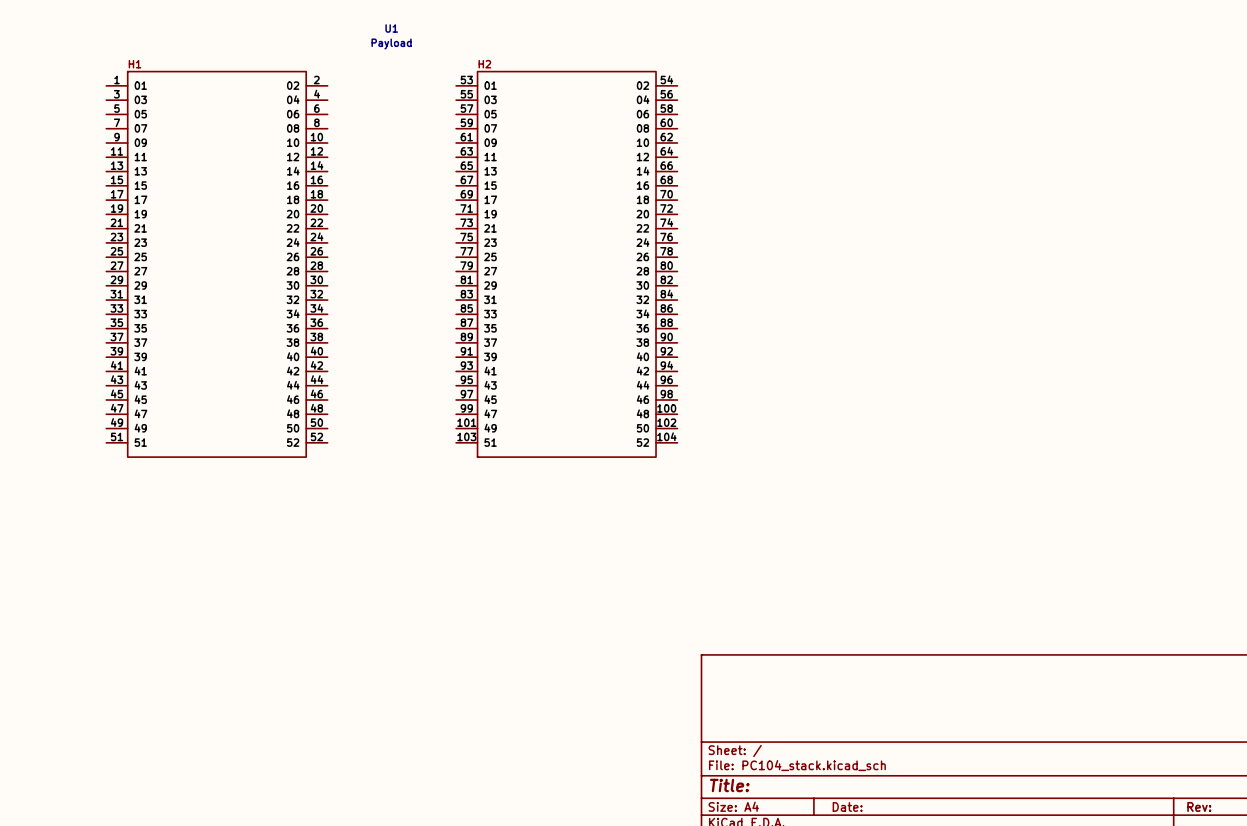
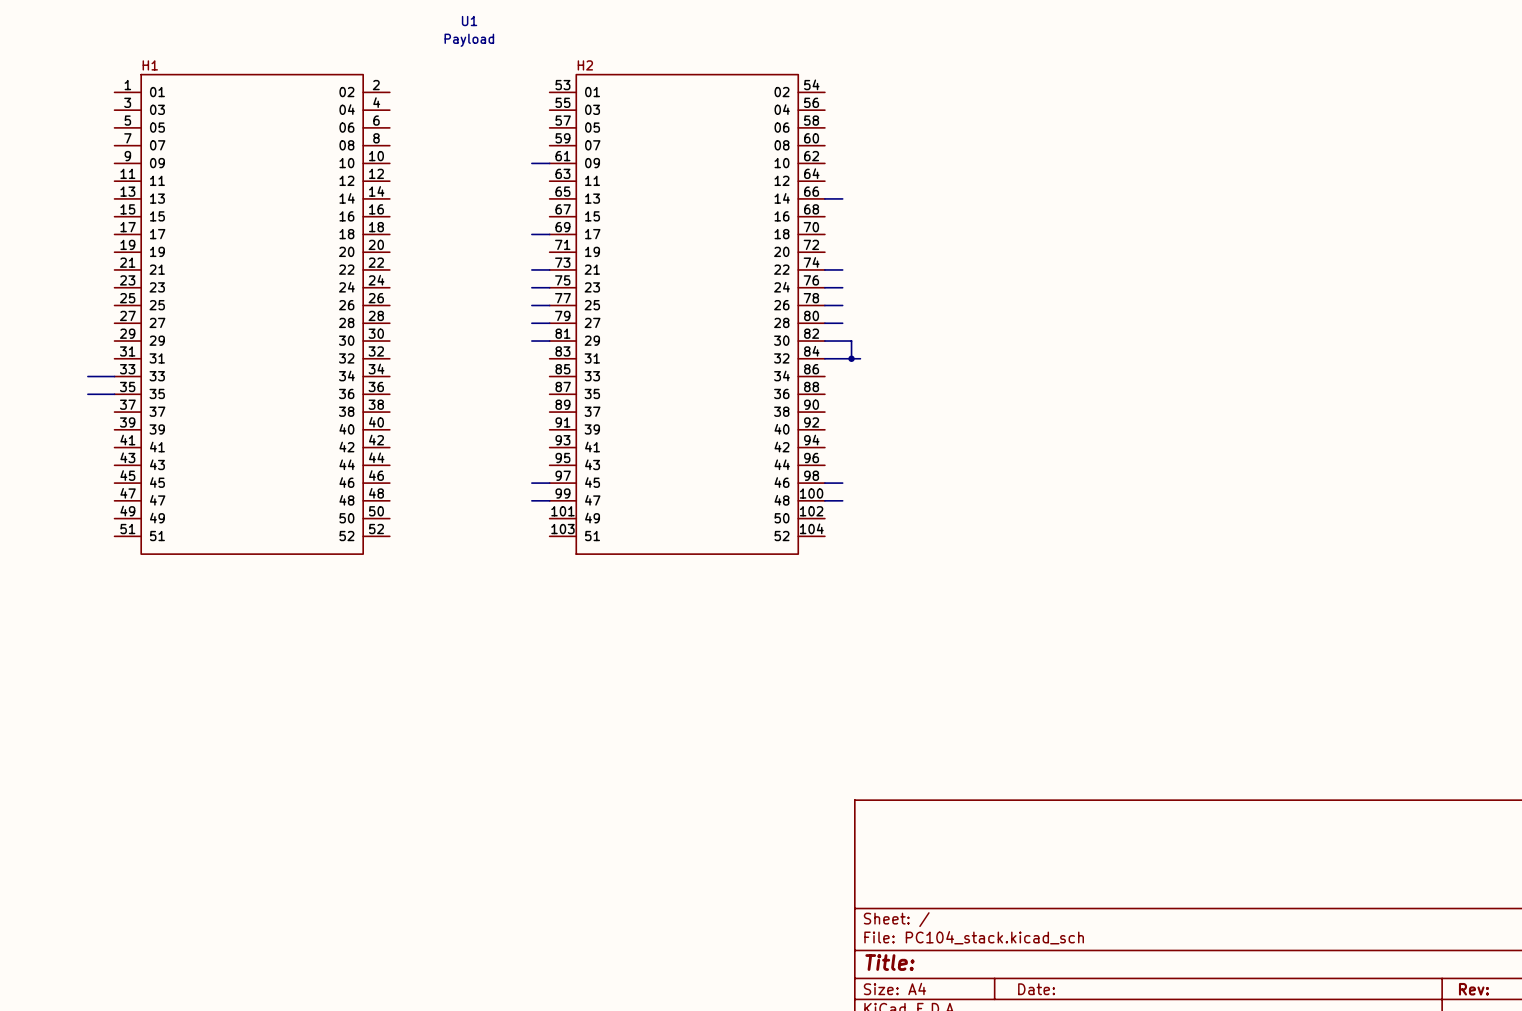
wire: none -> (531, 163) (549, 163)
wire: none -> (824, 198) (842, 198)
wire: none -> (531, 234) (549, 234)
wire: none -> (531, 269) (549, 269)
wire: none -> (824, 269) (842, 269)
wire: none -> (531, 287) (549, 287)
wire: none -> (824, 287) (842, 287)
wire: none -> (531, 305) (549, 305)
wire: none -> (824, 305) (842, 305)
wire: none -> (531, 323) (549, 323)
wire: none -> (824, 323) (842, 323)
wire: none -> (531, 341) (549, 341)
wire: none -> (824, 341) (851, 341) (851, 358)
wire: none -> (824, 358) (860, 358)
junction: none -> (851, 358)
wire: none -> (87, 376) (114, 376)
wire: none -> (87, 394) (114, 394)
wire: none -> (531, 483) (549, 483)
wire: none -> (824, 483) (842, 483)
wire: none -> (531, 500) (549, 500)
wire: none -> (824, 500) (842, 500)

